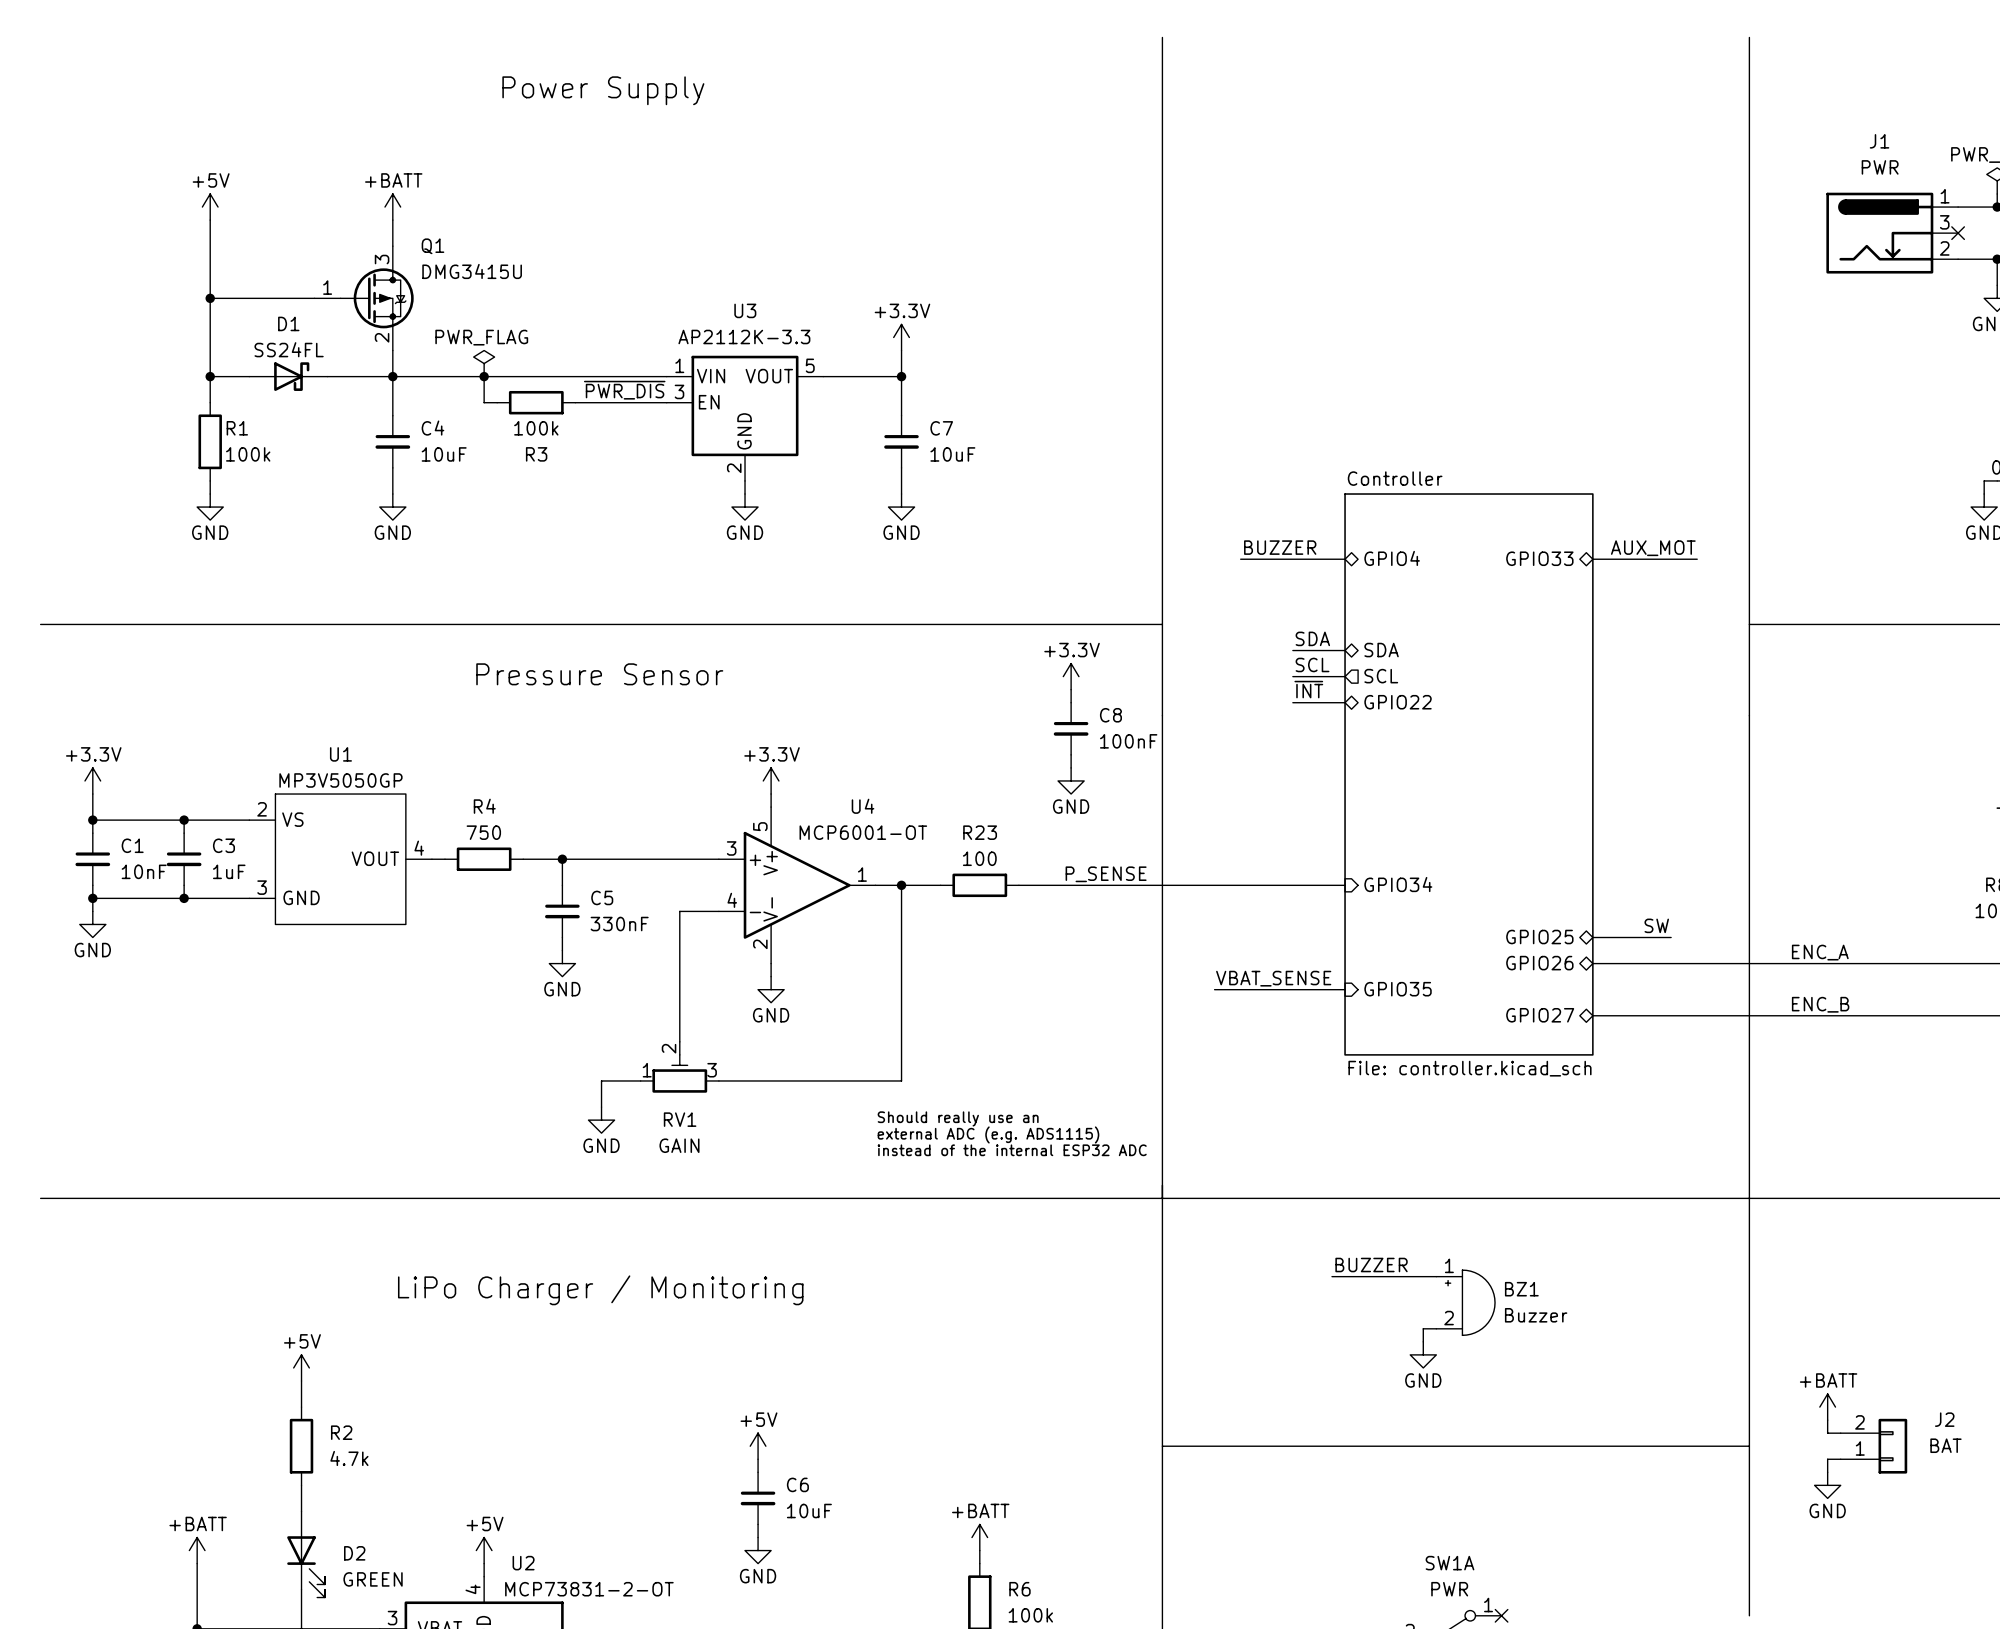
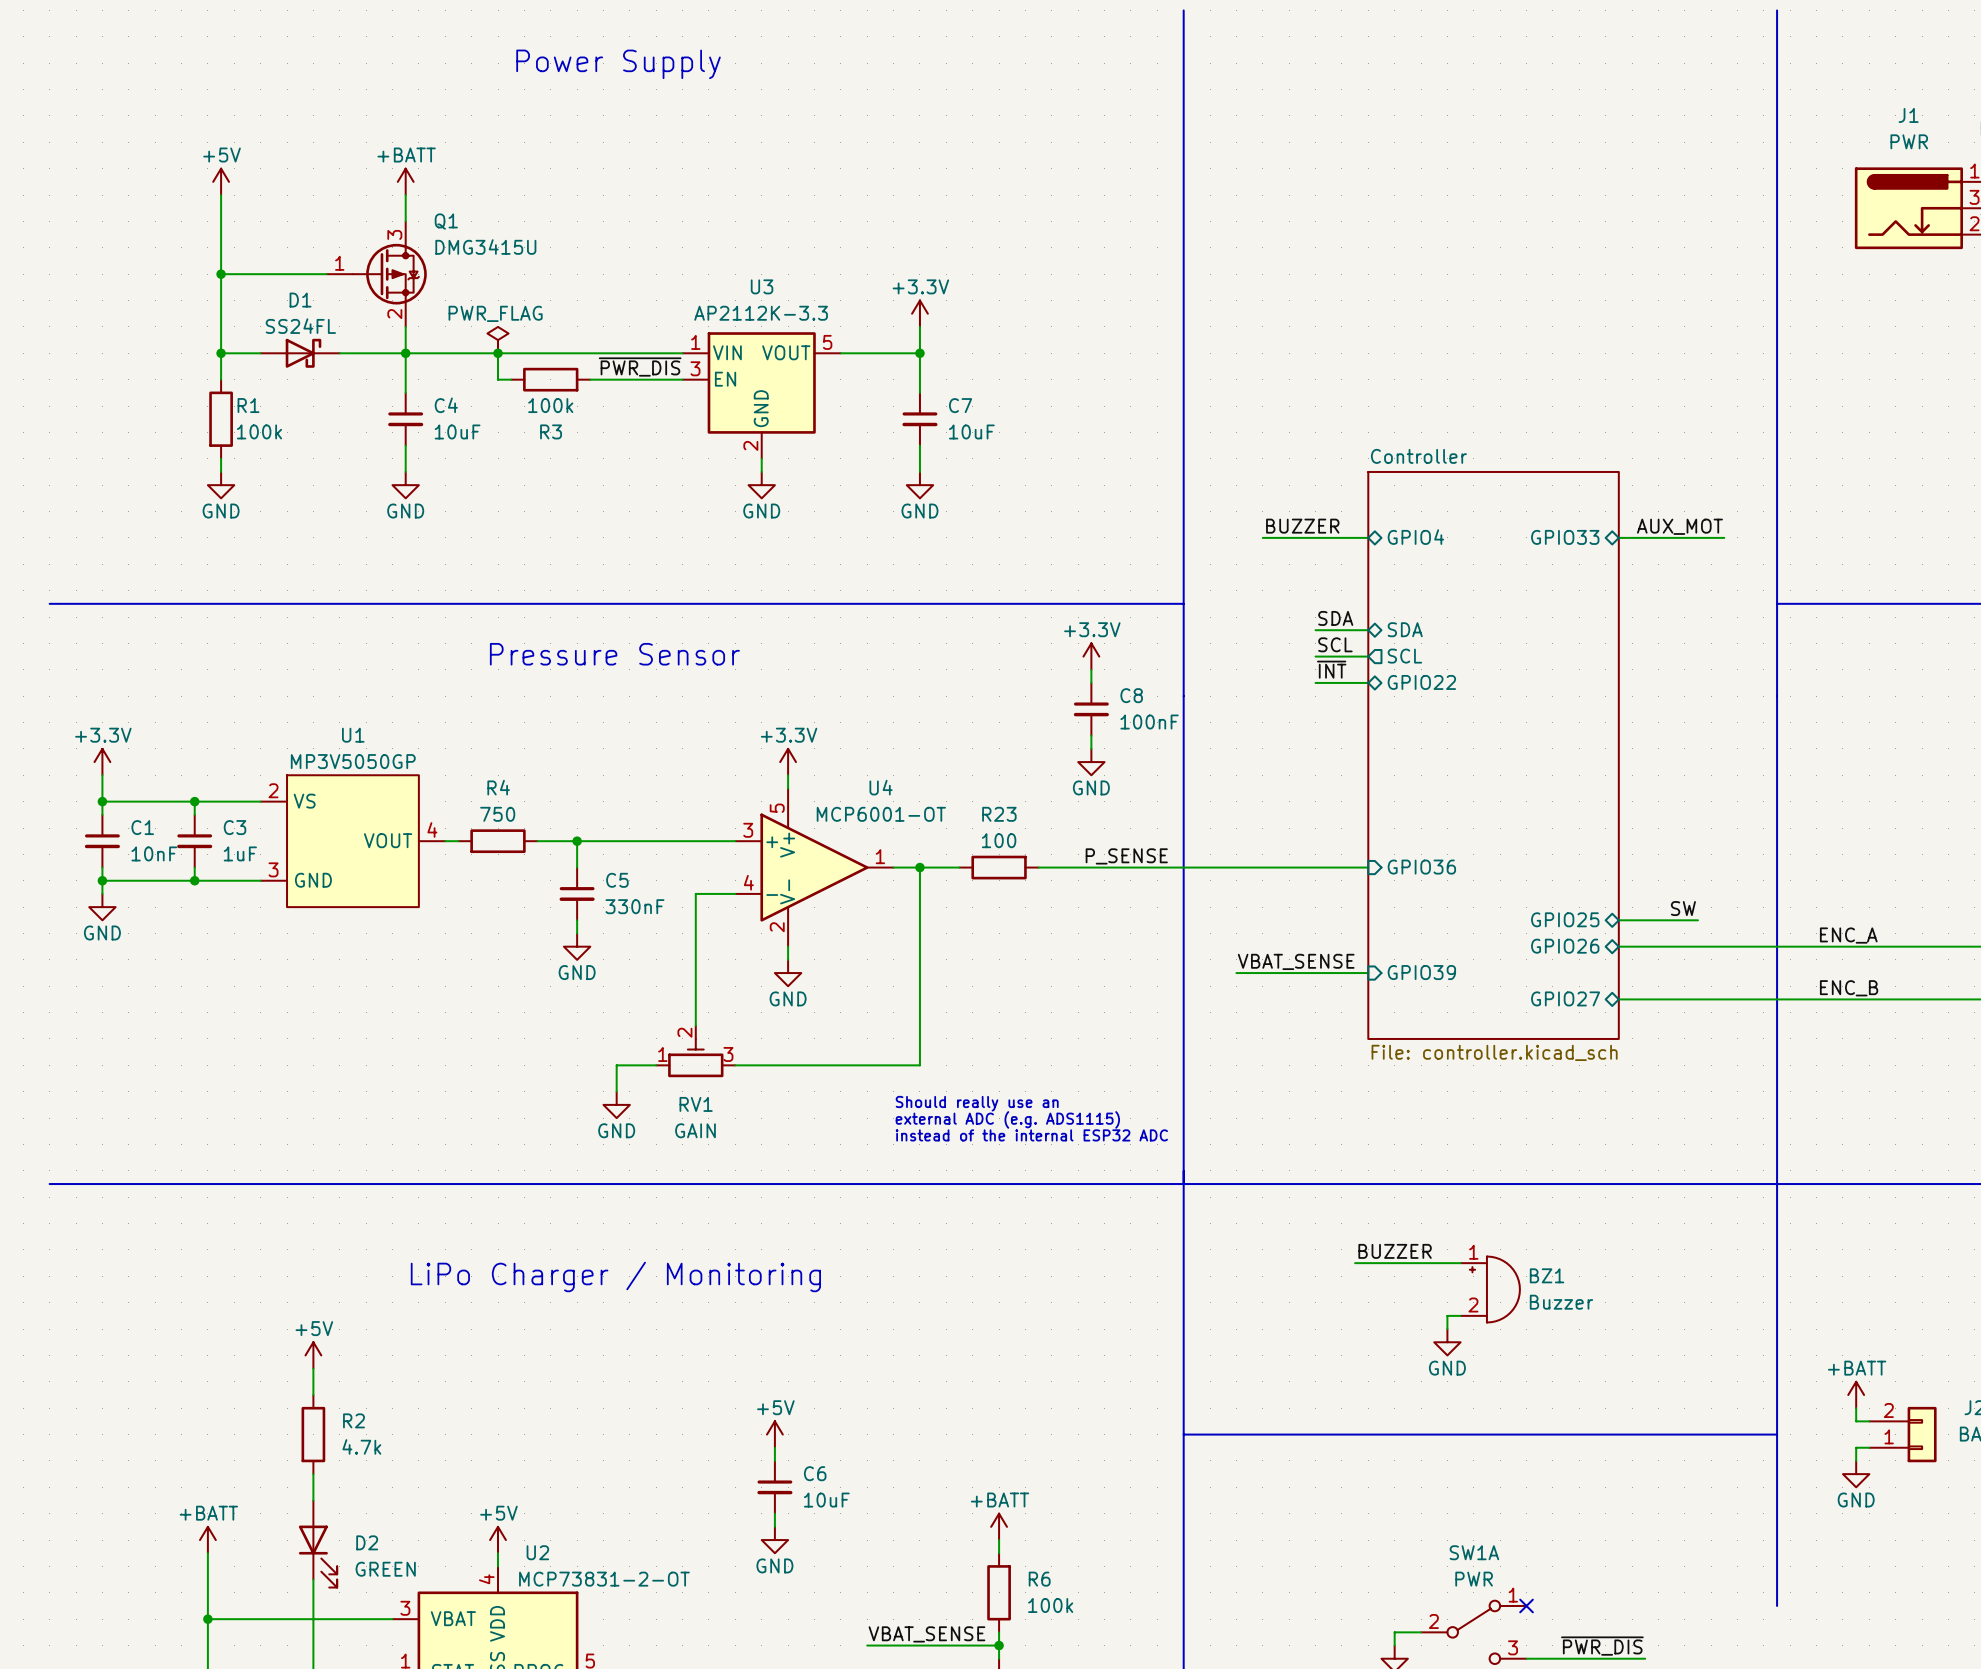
sheet pin: GPIO34 (1398, 884) -> GPIO36 (1421, 867)
sheet pin: GPIO35 (1398, 989) -> GPIO39 (1421, 972)

